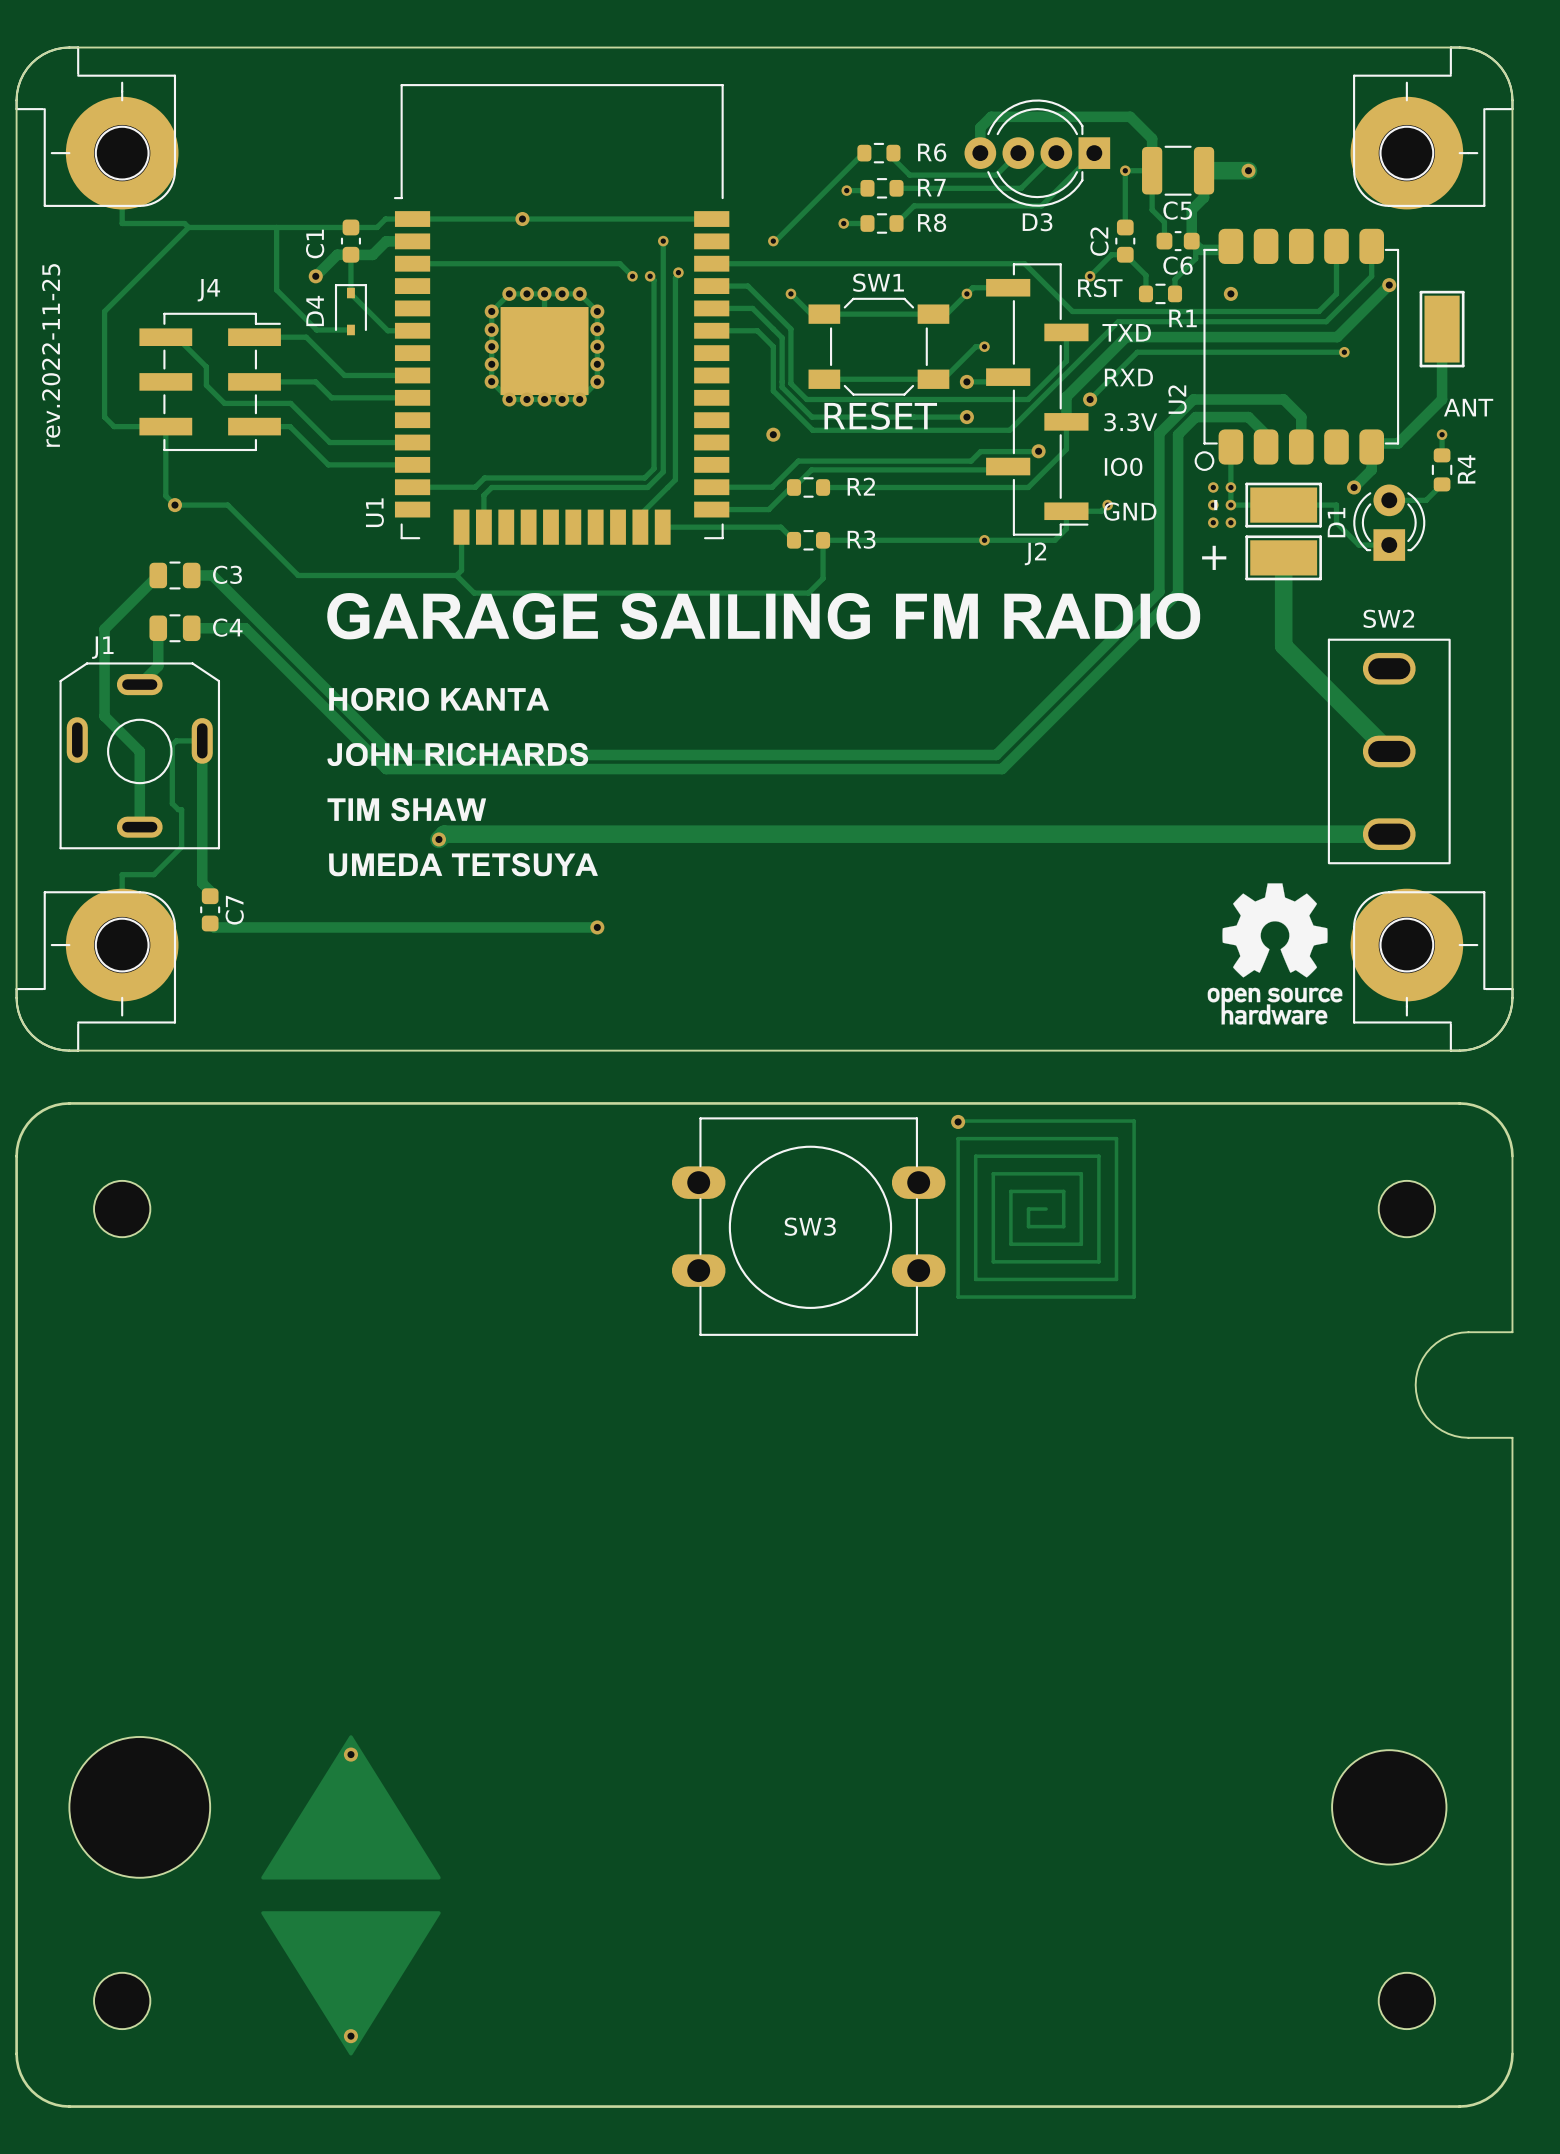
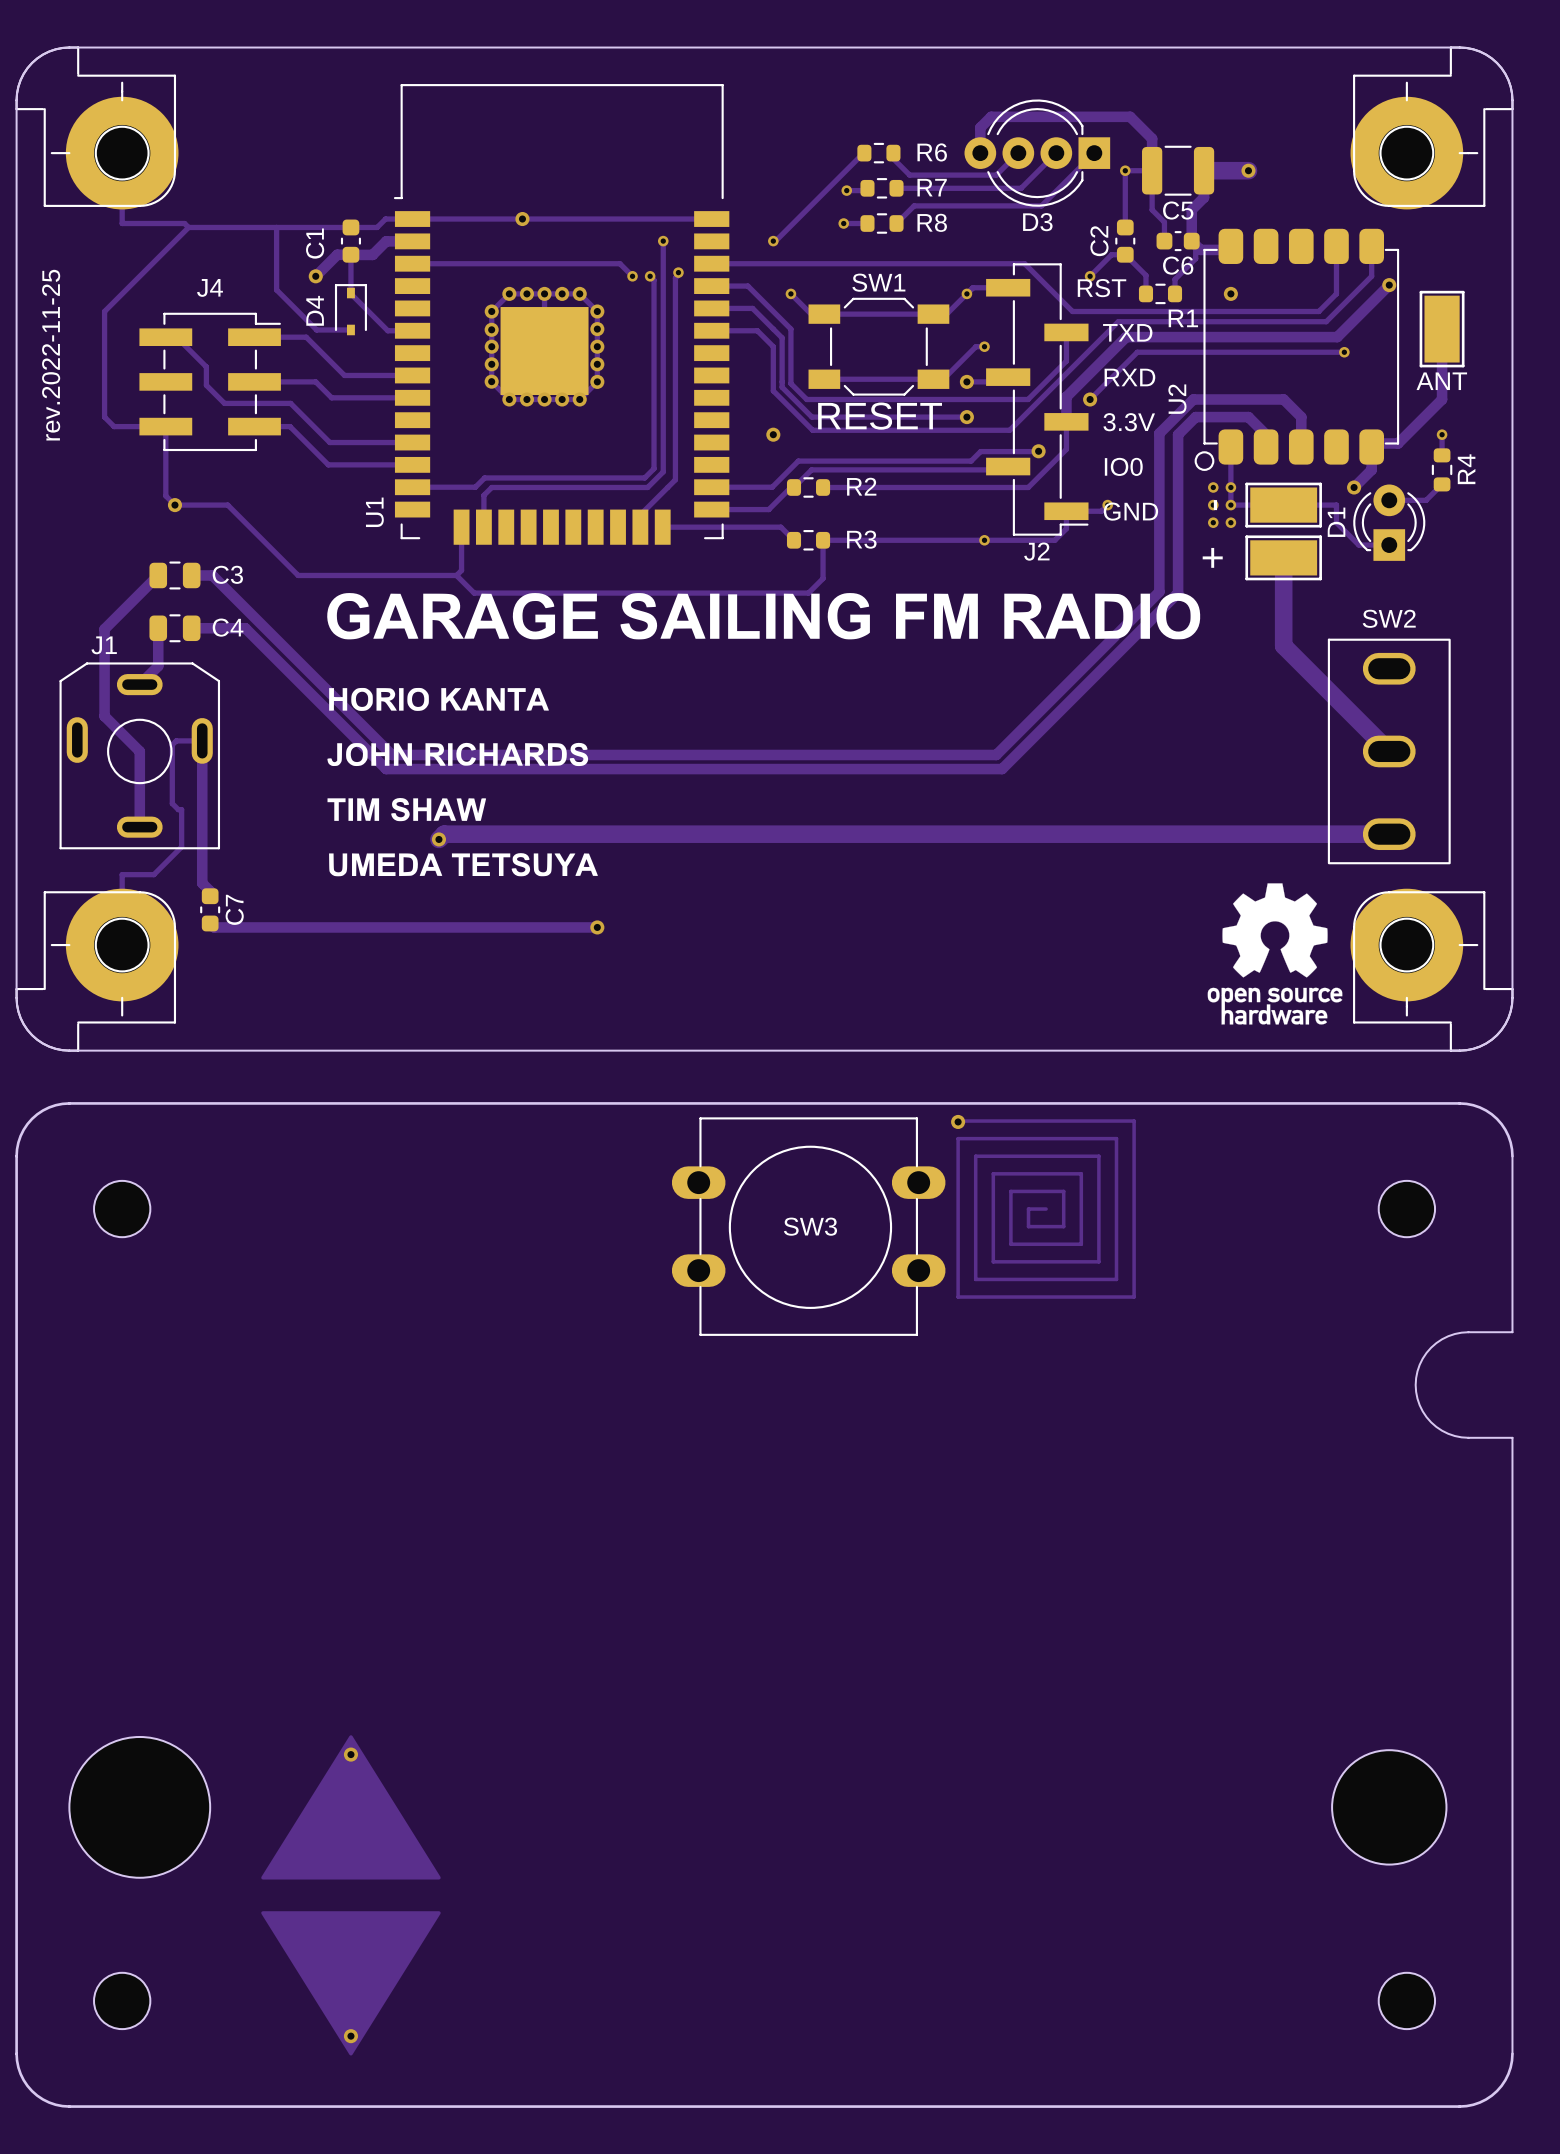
text position: ANT (1468, 407) -> ANT (1441, 381)

